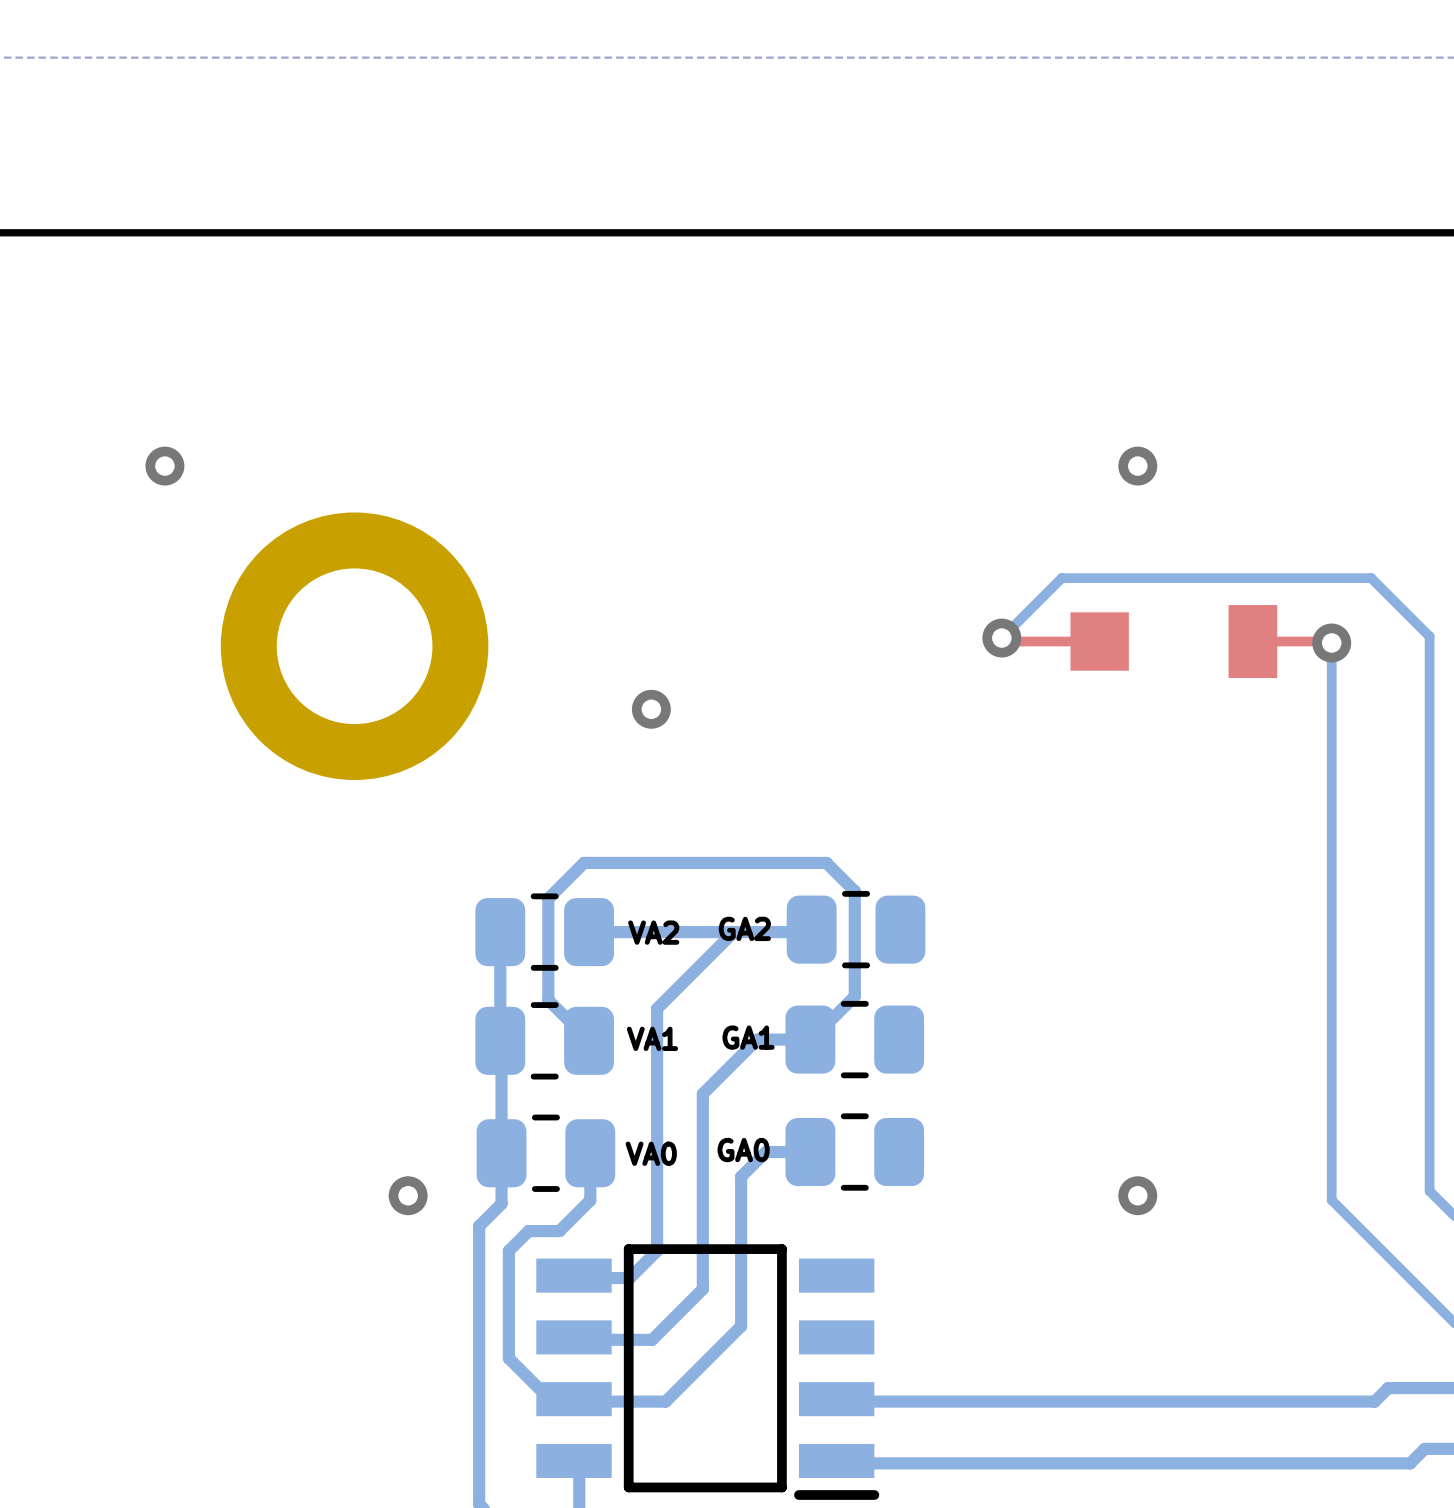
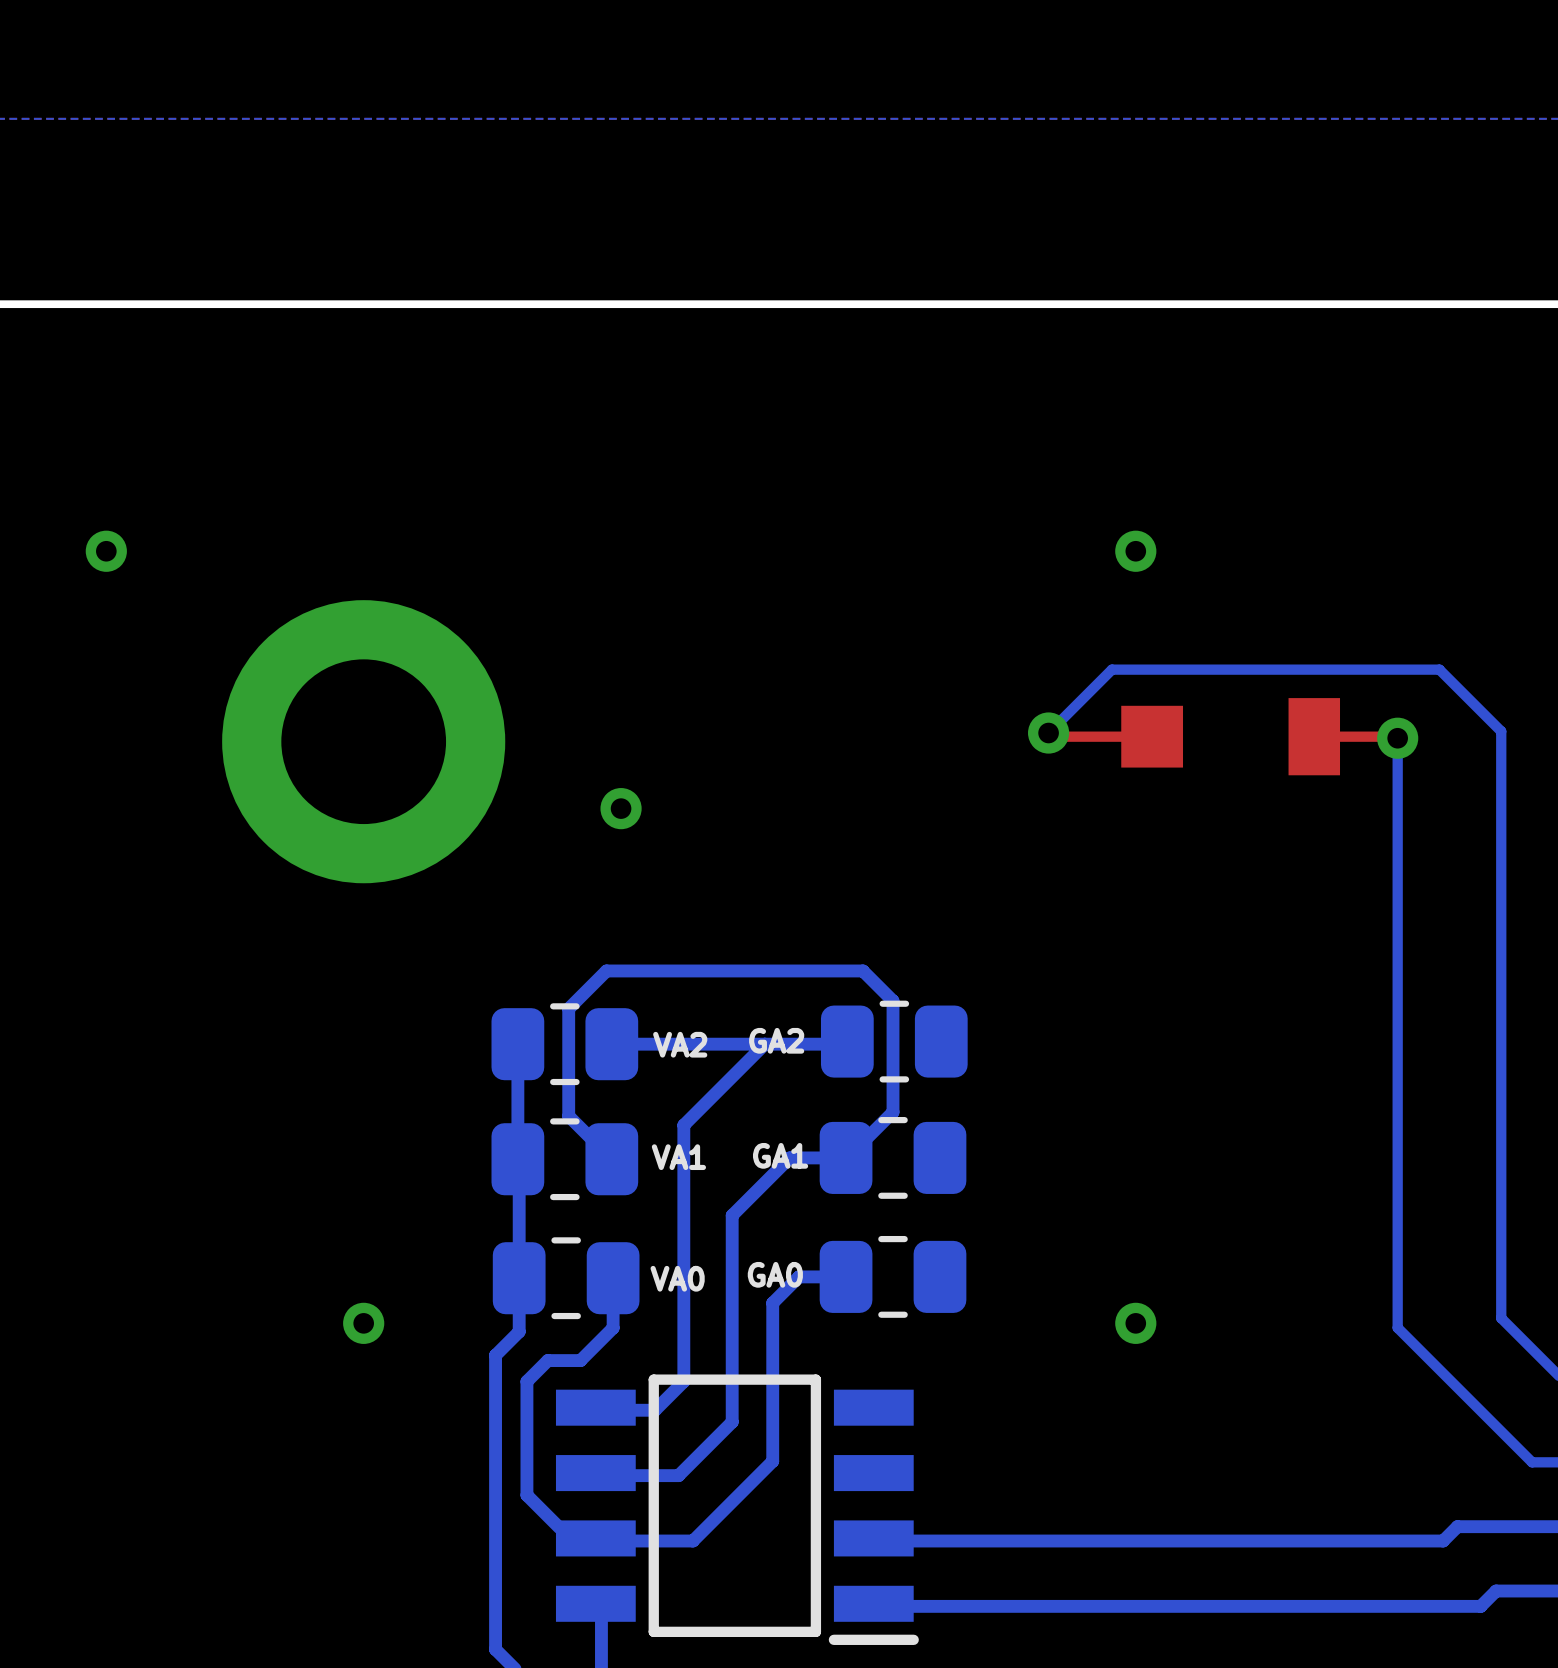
via position: (164, 466) -> (106, 551)
via position: (1137, 466) -> (1135, 551)
via position: (651, 709) -> (621, 808)
via position: (408, 1195) -> (363, 1323)
via position: (1137, 1195) -> (1135, 1323)

